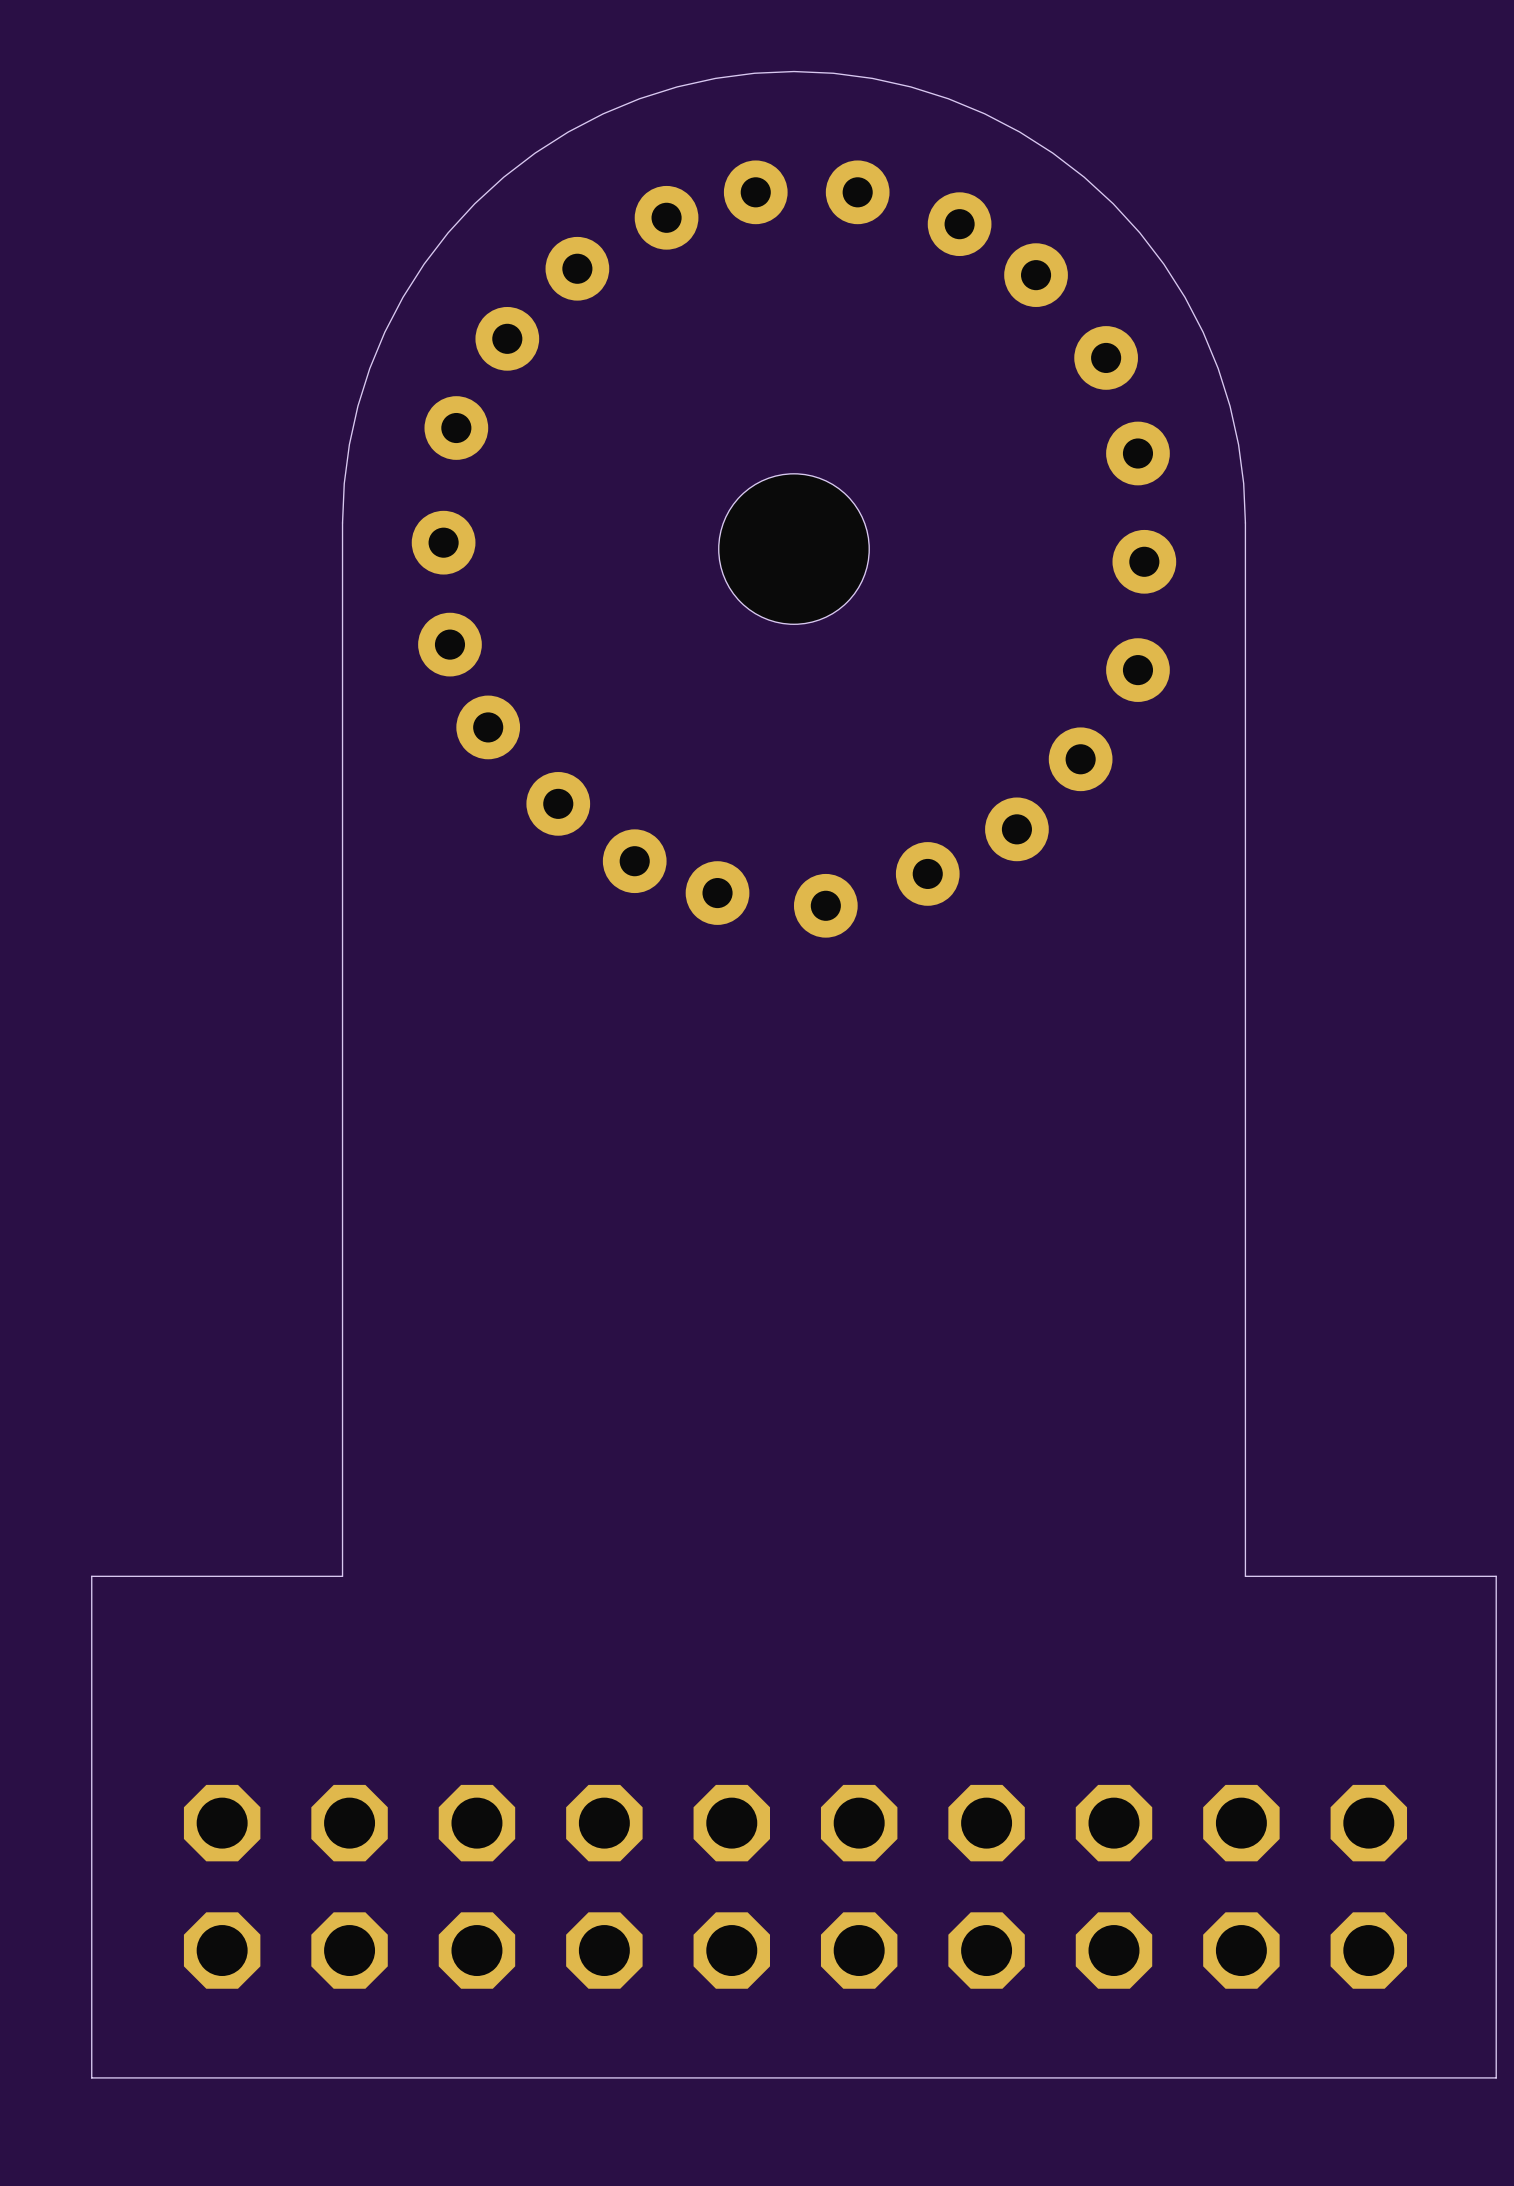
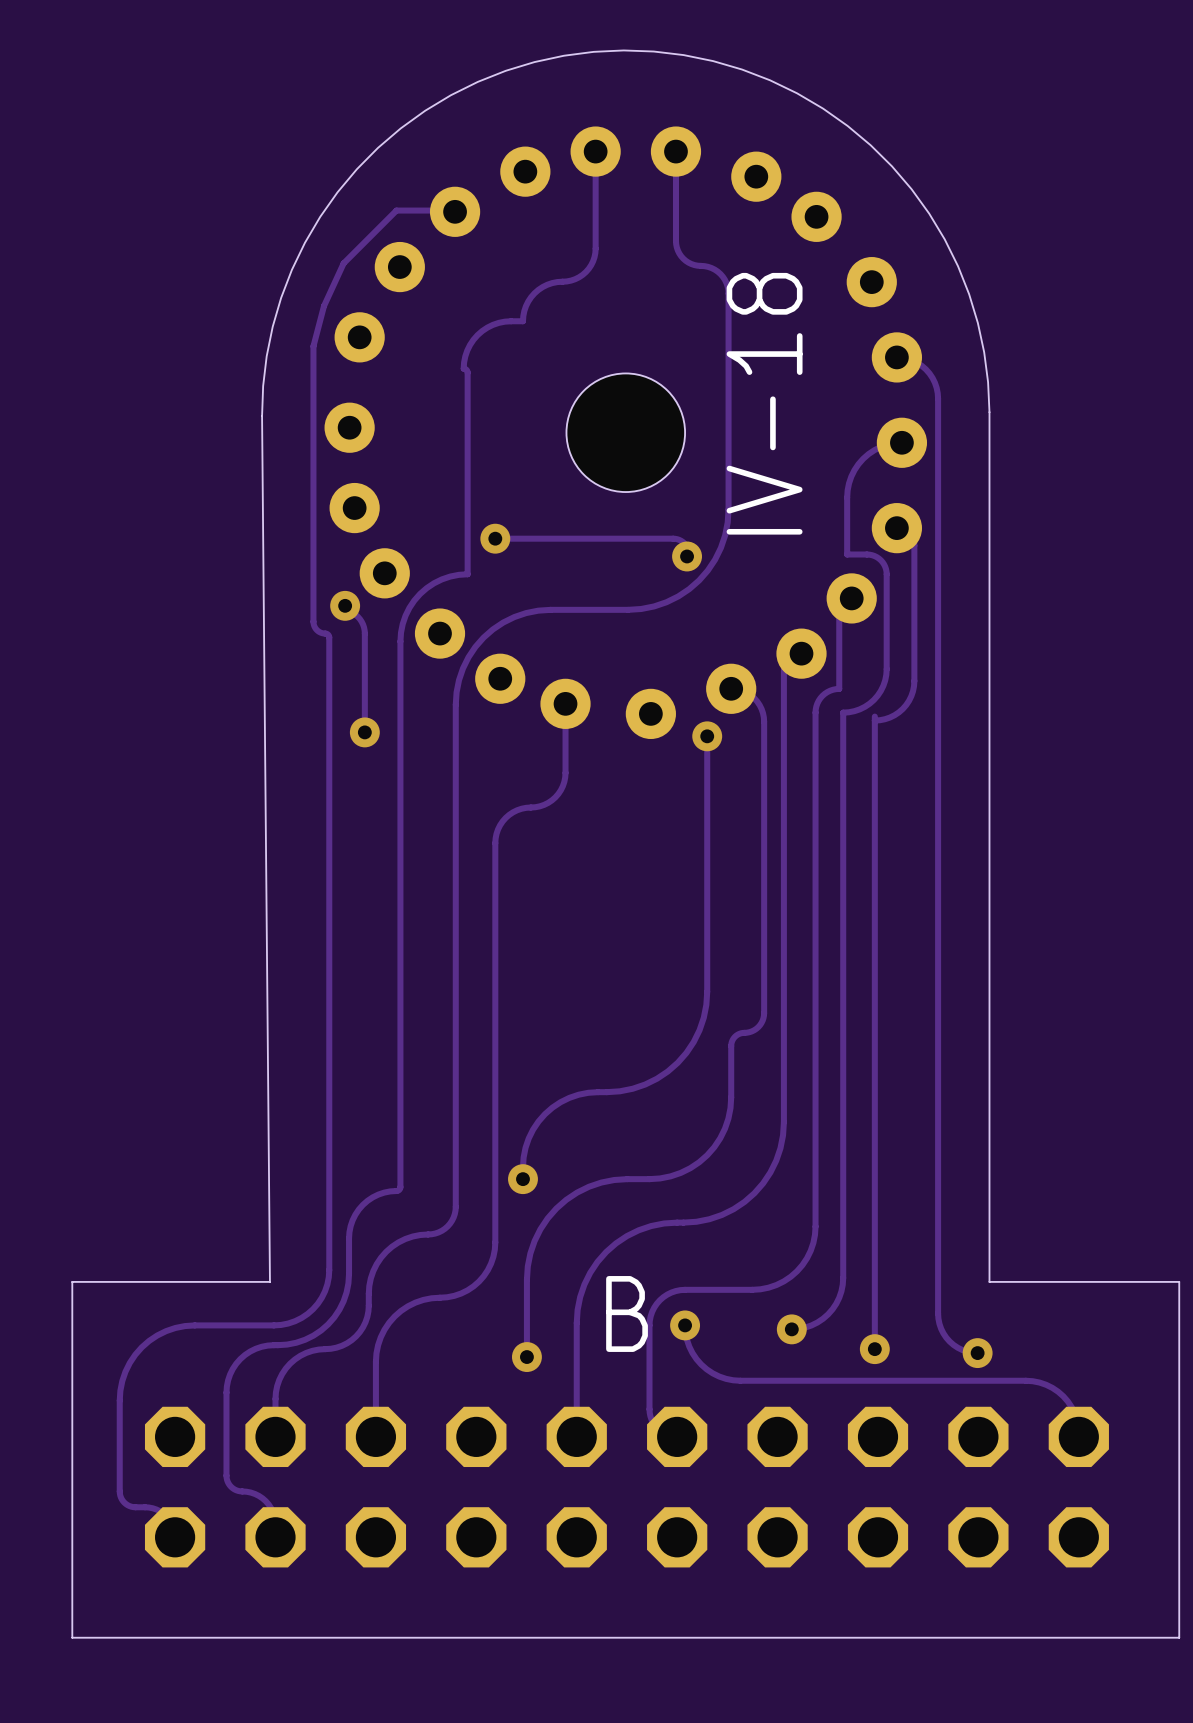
track: none -> (595, 151) (595, 248) (591, 265) (585, 272) (575, 279) (552, 283) (538, 289) (525, 306) (522, 321) (504, 321) (487, 327) (473, 339) (467, 350) (463, 368) (467, 372) (467, 574) (441, 579) (426, 588) (409, 607) (402, 624) (400, 641) (400, 1187) (397, 1190) (384, 1192) (372, 1197) (362, 1204) (355, 1214) (349, 1232) (349, 1274) (346, 1292) (339, 1309) (328, 1324) (305, 1339) (287, 1344) (261, 1346) (250, 1351) (240, 1359) (230, 1374) (226, 1392) (227, 1479) (234, 1489) (255, 1493) (268, 1504) (274, 1516) (275, 1537)
track: none -> (675, 151) (675, 241) (677, 250) (688, 262) (708, 266) (717, 271) (724, 279) (728, 289) (728, 509) (725, 535) (715, 559) (699, 580) (678, 596) (666, 602) (641, 608) (550, 609) (526, 613) (503, 622) (492, 629) (483, 637) (468, 657) (459, 680) (455, 704) (454, 1213) (450, 1223) (441, 1230) (405, 1239) (392, 1246) (381, 1257) (370, 1278) (367, 1316) (356, 1336) (336, 1347) (306, 1352) (294, 1359) (285, 1368) (279, 1379) (275, 1392) (275, 1436)
track: none -> (455, 211) (396, 210) (343, 263) (323, 306) (313, 346) (313, 621) (316, 630) (327, 634) (329, 637) (328, 1277) (325, 1291) (317, 1303) (307, 1313) (295, 1321) (273, 1325) (194, 1325) (175, 1327) (149, 1340) (129, 1362) (120, 1390) (120, 1495) (124, 1502) (129, 1506) (152, 1508) (163, 1513) (172, 1525) (175, 1537)
track: none -> (896, 357) (912, 360) (926, 369) (932, 378) (937, 393) (938, 1313) (941, 1328) (949, 1341) (962, 1350) (977, 1353)
text: none -> IV-18 (764, 403)
track: none -> (901, 442) (880, 446) (863, 458) (851, 476) (847, 490) (847, 554) (874, 556) (882, 562) (886, 569) (886, 674) (880, 690) (869, 703) (854, 711) (843, 712) (842, 1284) (836, 1303) (823, 1318) (811, 1325) (791, 1329)
track: none -> (896, 528) (907, 531) (914, 543) (914, 686) (909, 700) (898, 712) (885, 719) (874, 720)
track: none -> (495, 538) (675, 538) (682, 541) (686, 546) (689, 554) (687, 556)
via: none -> (495, 538)
via: none -> (687, 556)
track: none -> (851, 598) (842, 602) (839, 609) (839, 688) (830, 690) (822, 695) (817, 703) (815, 712) (815, 1226) (813, 1242) (802, 1265) (790, 1276) (776, 1285) (752, 1289) (680, 1290) (667, 1294) (656, 1303) (650, 1316) (649, 1325) (649, 1412) (653, 1423) (660, 1431) (677, 1436)
track: none -> (345, 605) (341, 609) (350, 611) (357, 616) (364, 630) (364, 732)
via: none -> (345, 605)
track: none -> (787, 667) (791, 657) (801, 653) (789, 658) (783, 671) (783, 1122) (780, 1148) (776, 1160) (763, 1183) (754, 1193) (733, 1209) (709, 1219) (664, 1223) (638, 1230) (616, 1243) (597, 1261) (584, 1284) (577, 1309) (576, 1436)
track: none -> (731, 688) (743, 691) (751, 695) (759, 705) (763, 717) (763, 1018) (756, 1028) (737, 1034) (732, 1040) (731, 1097) (728, 1118) (720, 1138) (707, 1155) (690, 1168) (670, 1176) (614, 1179) (588, 1186) (566, 1199) (547, 1218) (534, 1241) (527, 1266) (526, 1357)
track: none -> (565, 703) (565, 772) (560, 790) (555, 797) (544, 804) (521, 808) (509, 814) (500, 825) (495, 838) (495, 1242) (493, 1256) (487, 1270) (473, 1286) (454, 1295) (415, 1302) (394, 1316) (384, 1329) (376, 1353) (375, 1436)
track: none -> (874, 716) (874, 1349)
via: none -> (364, 732)
track: none -> (707, 736) (707, 991) (703, 1017) (699, 1030) (693, 1041) (677, 1062) (657, 1078) (632, 1088) (578, 1094) (552, 1107) (538, 1121) (528, 1138) (523, 1157) (522, 1179)
via: none -> (707, 736)
via: none -> (522, 1179)
board edge: (1496, 1626) (1496, 1576) (1245, 1576) (1245, 522) (1243, 483) (1238, 444) (1230, 406) (1218, 368) (1203, 332) (1184, 297) (1163, 264) (1139, 232) (1113, 203) (1084, 177) (1052, 153) (1019, 132) (984, 113) (948, 98) (910, 86) (872, 78) (833, 73) (793, 71) (754, 73) (715, 78) (677, 86) (639, 98) (603, 113) (568, 132) (535, 153) (503, 177) (474, 203) (448, 232) (424, 264) (403, 297) (384, 332) (369, 368) (357, 406) (349, 444) (344, 483) (342, 522) (342, 1576) (91, 1576) (91, 1626) -> (1179, 1281) (989, 1281) (989, 412) (984, 352) (969, 294) (958, 266) (929, 213) (892, 166) (847, 125) (823, 108) (770, 80) (713, 61) (683, 55) (623, 50) (563, 55) (505, 70) (450, 95) (425, 110) (377, 147) (337, 192) (320, 216) (291, 269) (281, 297) (266, 356) (262, 416) (269, 1281) (72, 1281)
text: none -> B (627, 1313)
track: none -> (685, 1325) (686, 1339) (696, 1359) (712, 1373) (733, 1380) (1025, 1380) (1039, 1382) (1058, 1391) (1067, 1401) (1077, 1420) (1078, 1436)
via: none -> (685, 1325)
via: none -> (791, 1329)
via: none -> (874, 1349)
via: none -> (977, 1353)
via: none -> (526, 1357)

